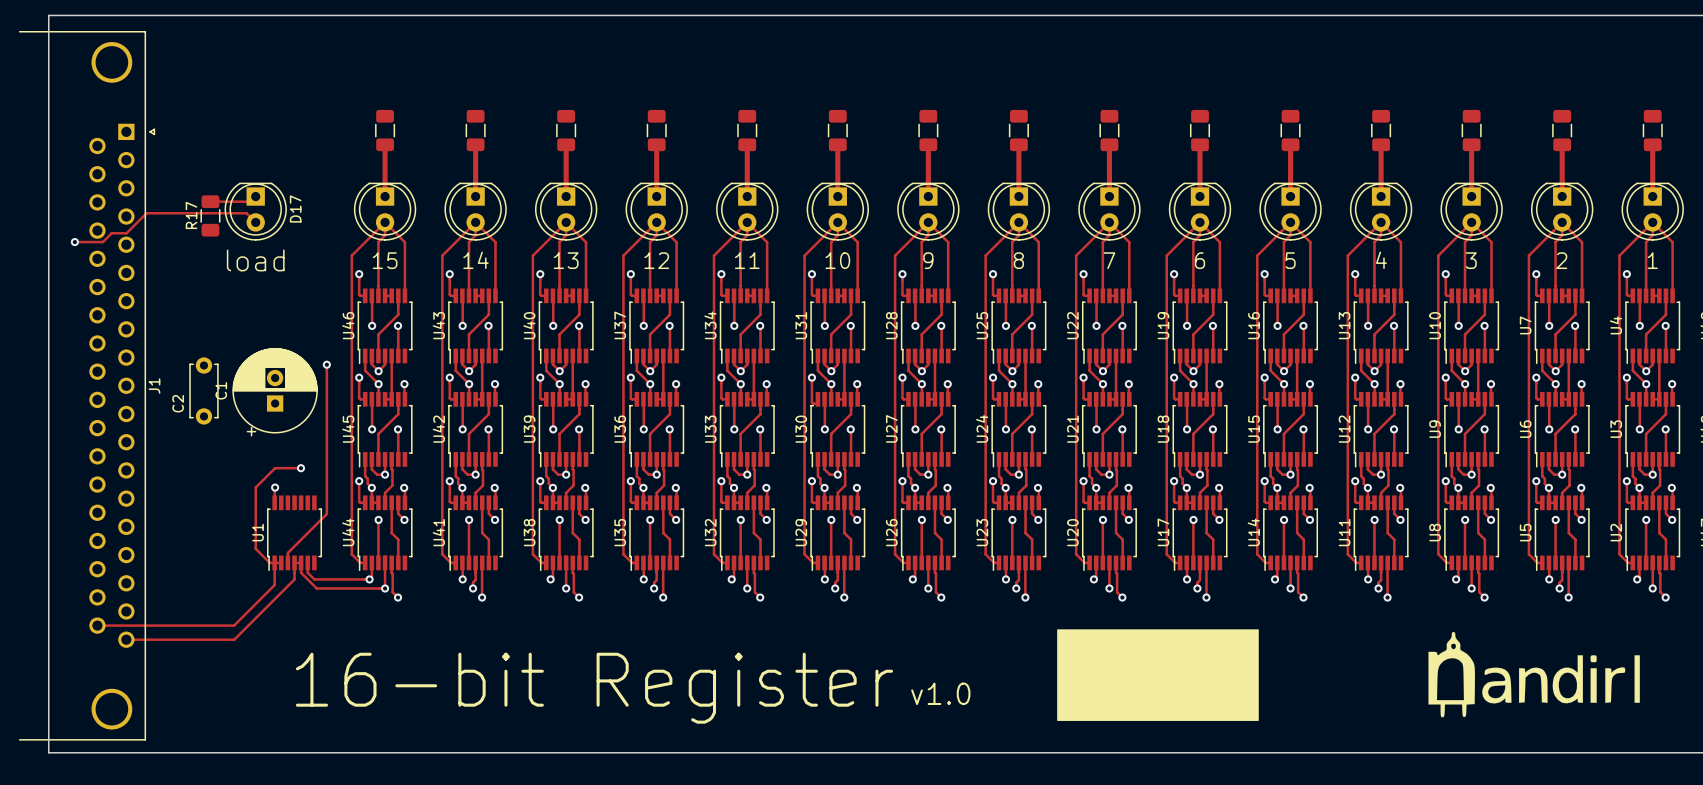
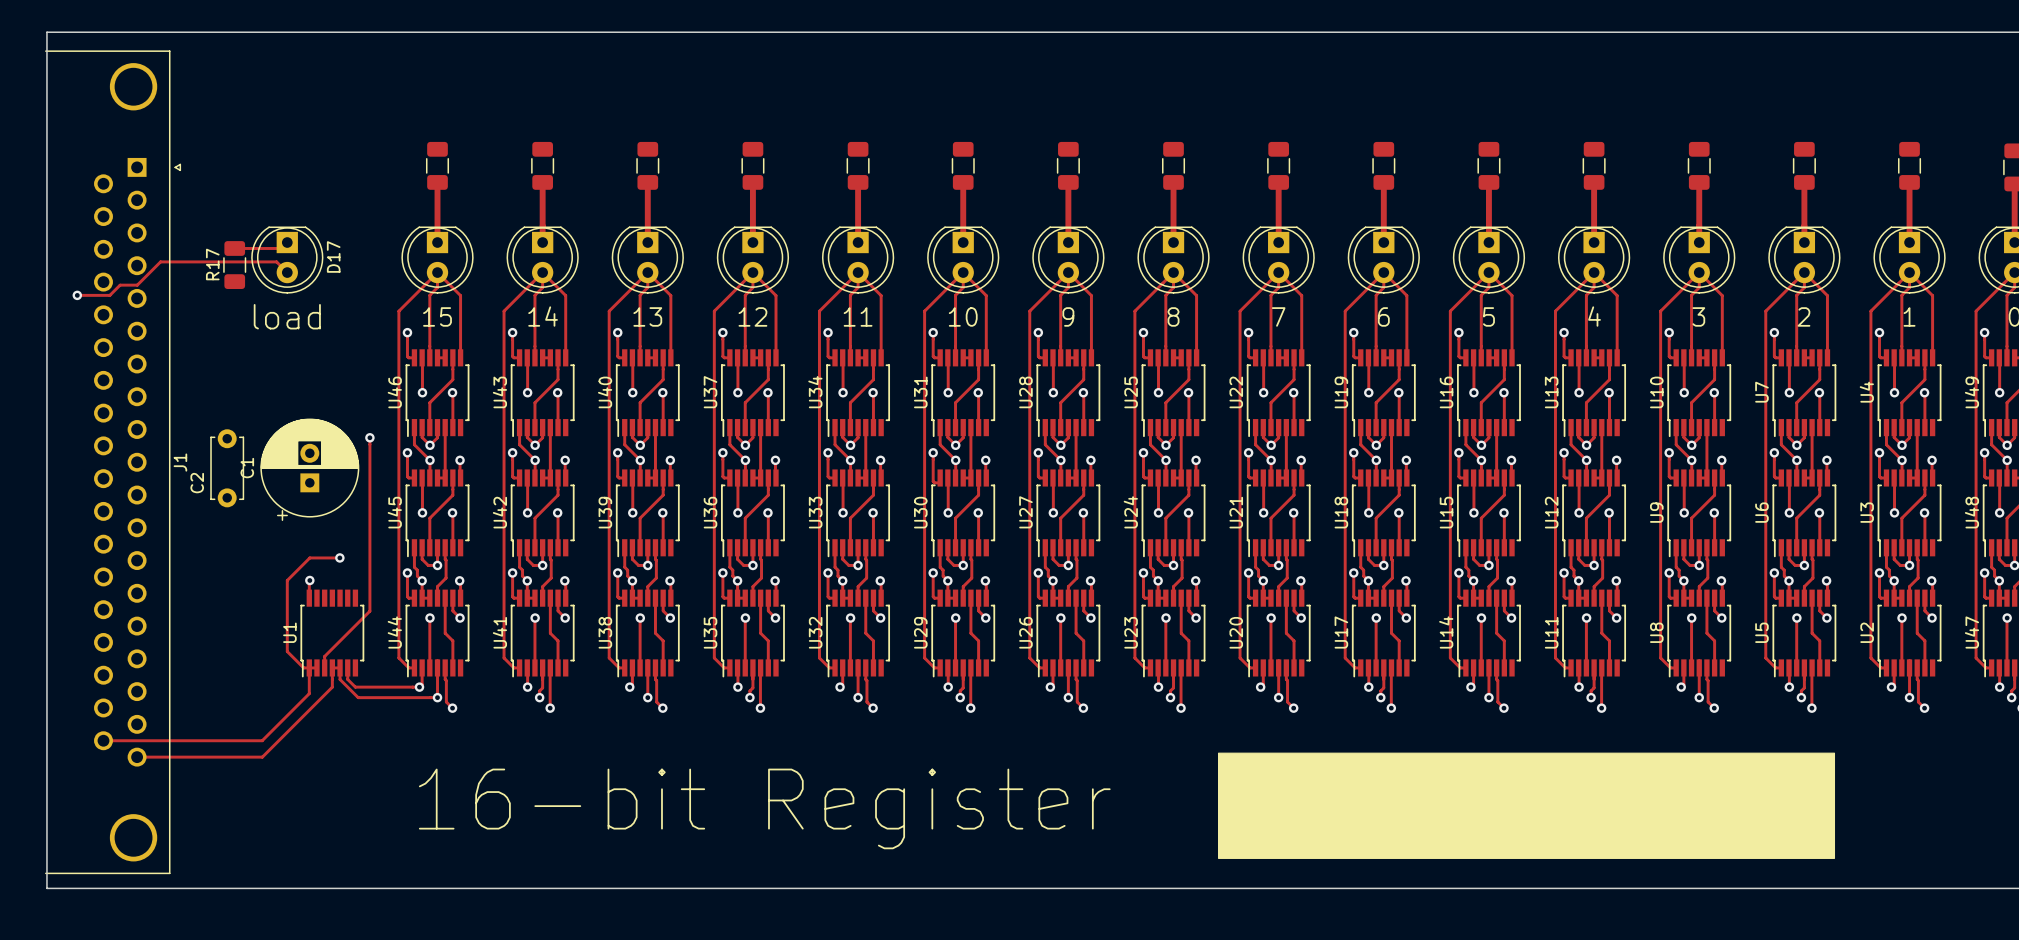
J1 footprint: [19, 31, 156, 741] -> [45, 50, 182, 875]
drawing: [1057, 629, 1259, 721] -> none
drawing: [1428, 631, 1640, 718] -> none
drawing: none -> [1217, 752, 1836, 859]
text position: 16-bit Register (594, 688) -> 16-bit Register (764, 808)
text: v1.0 (940, 693) -> none

